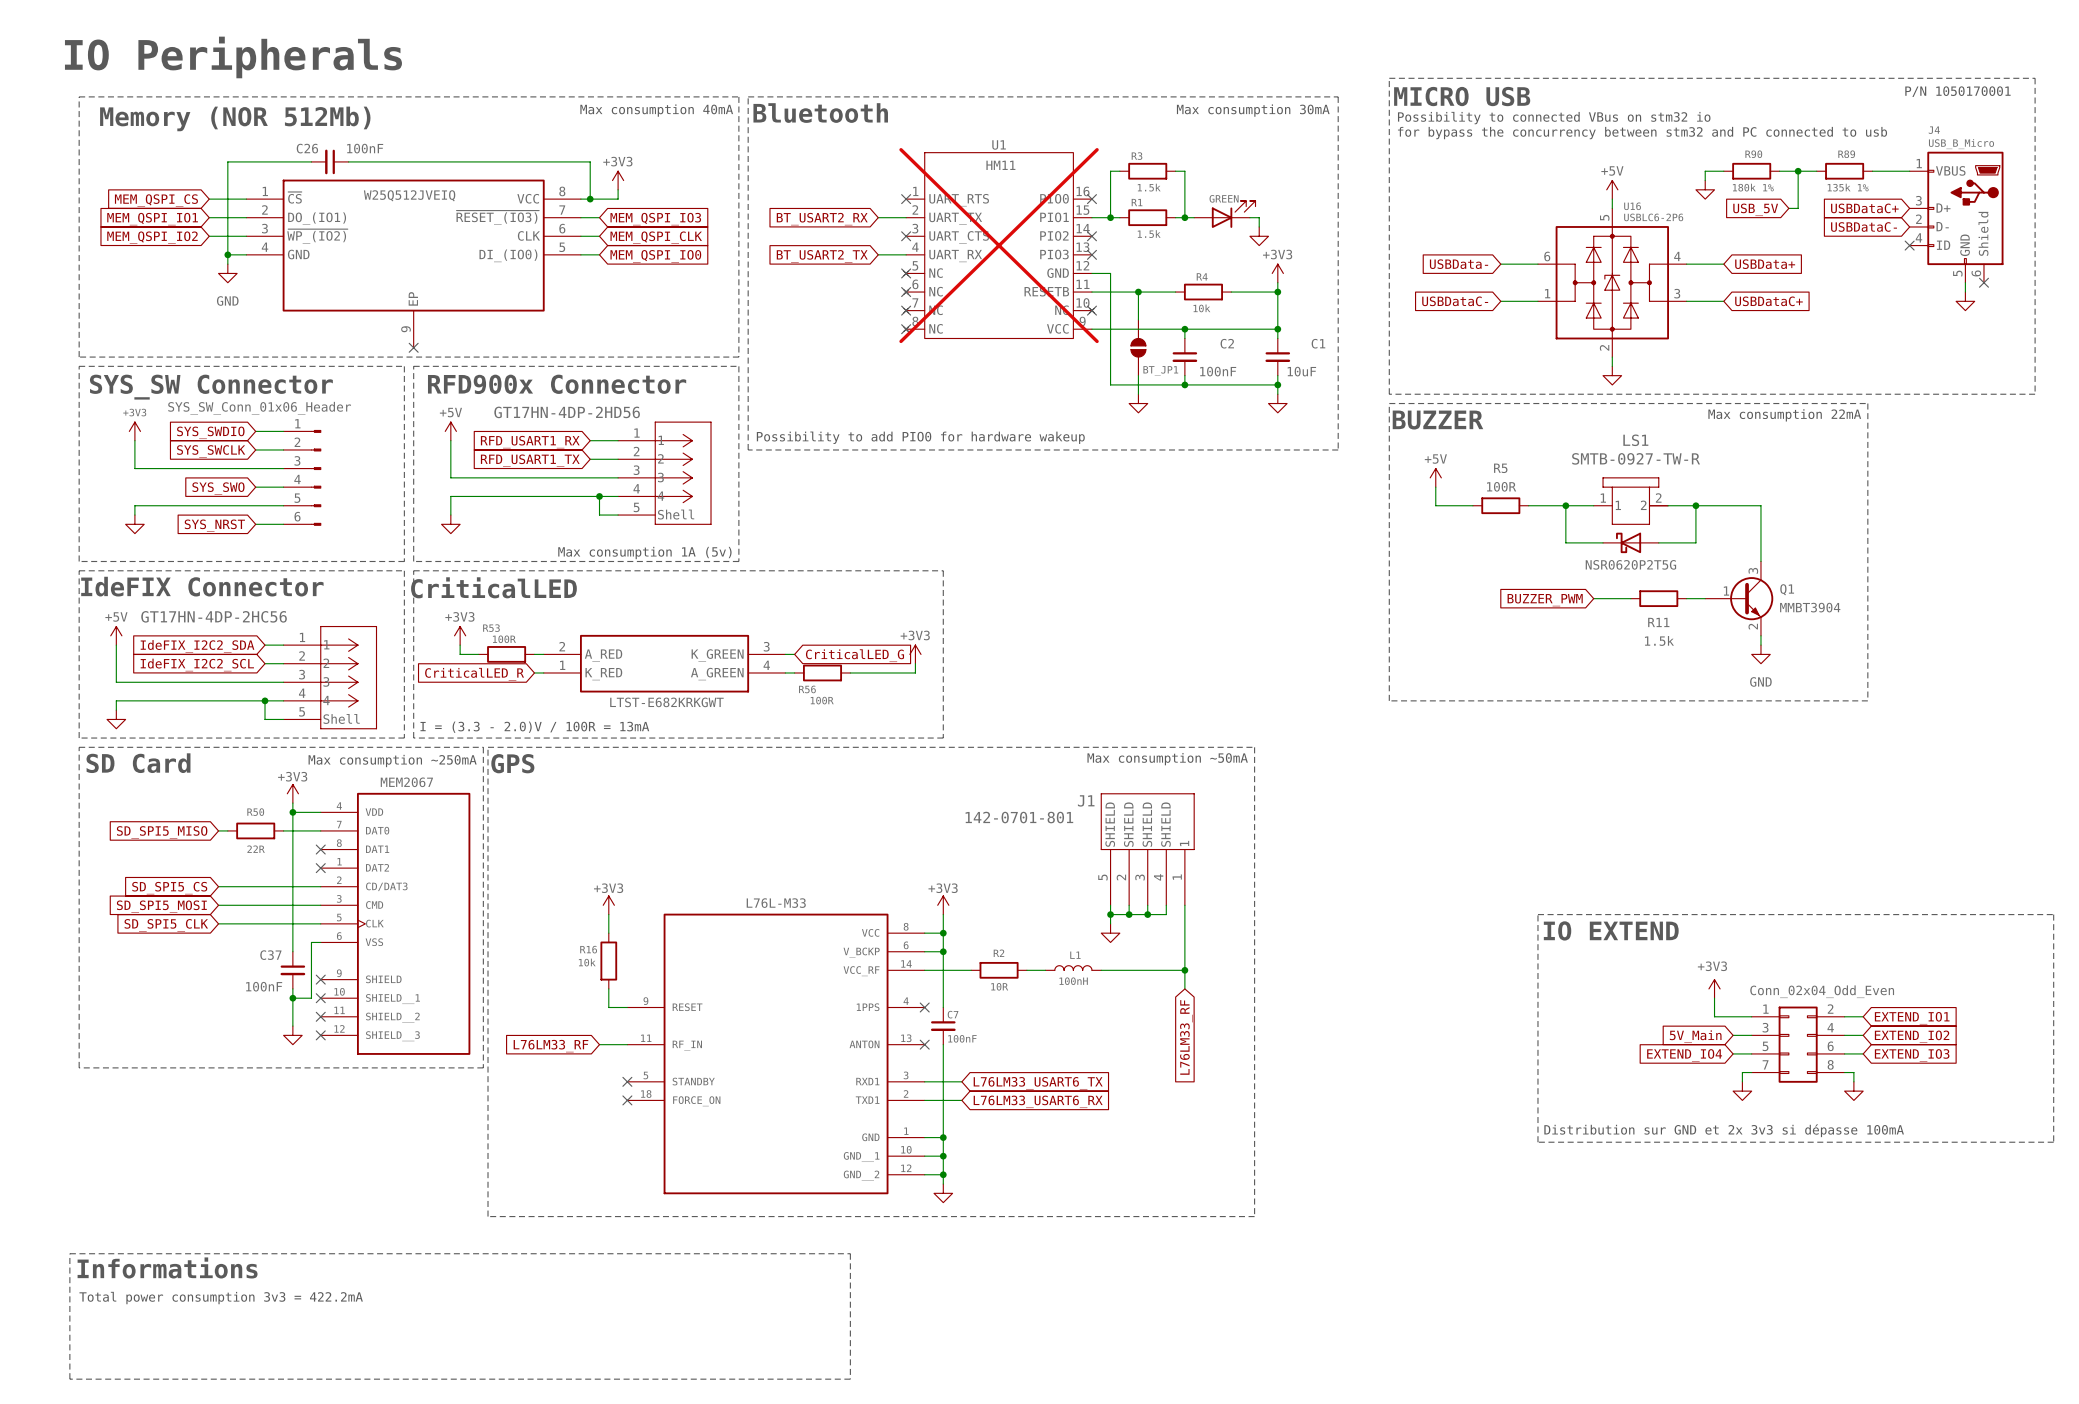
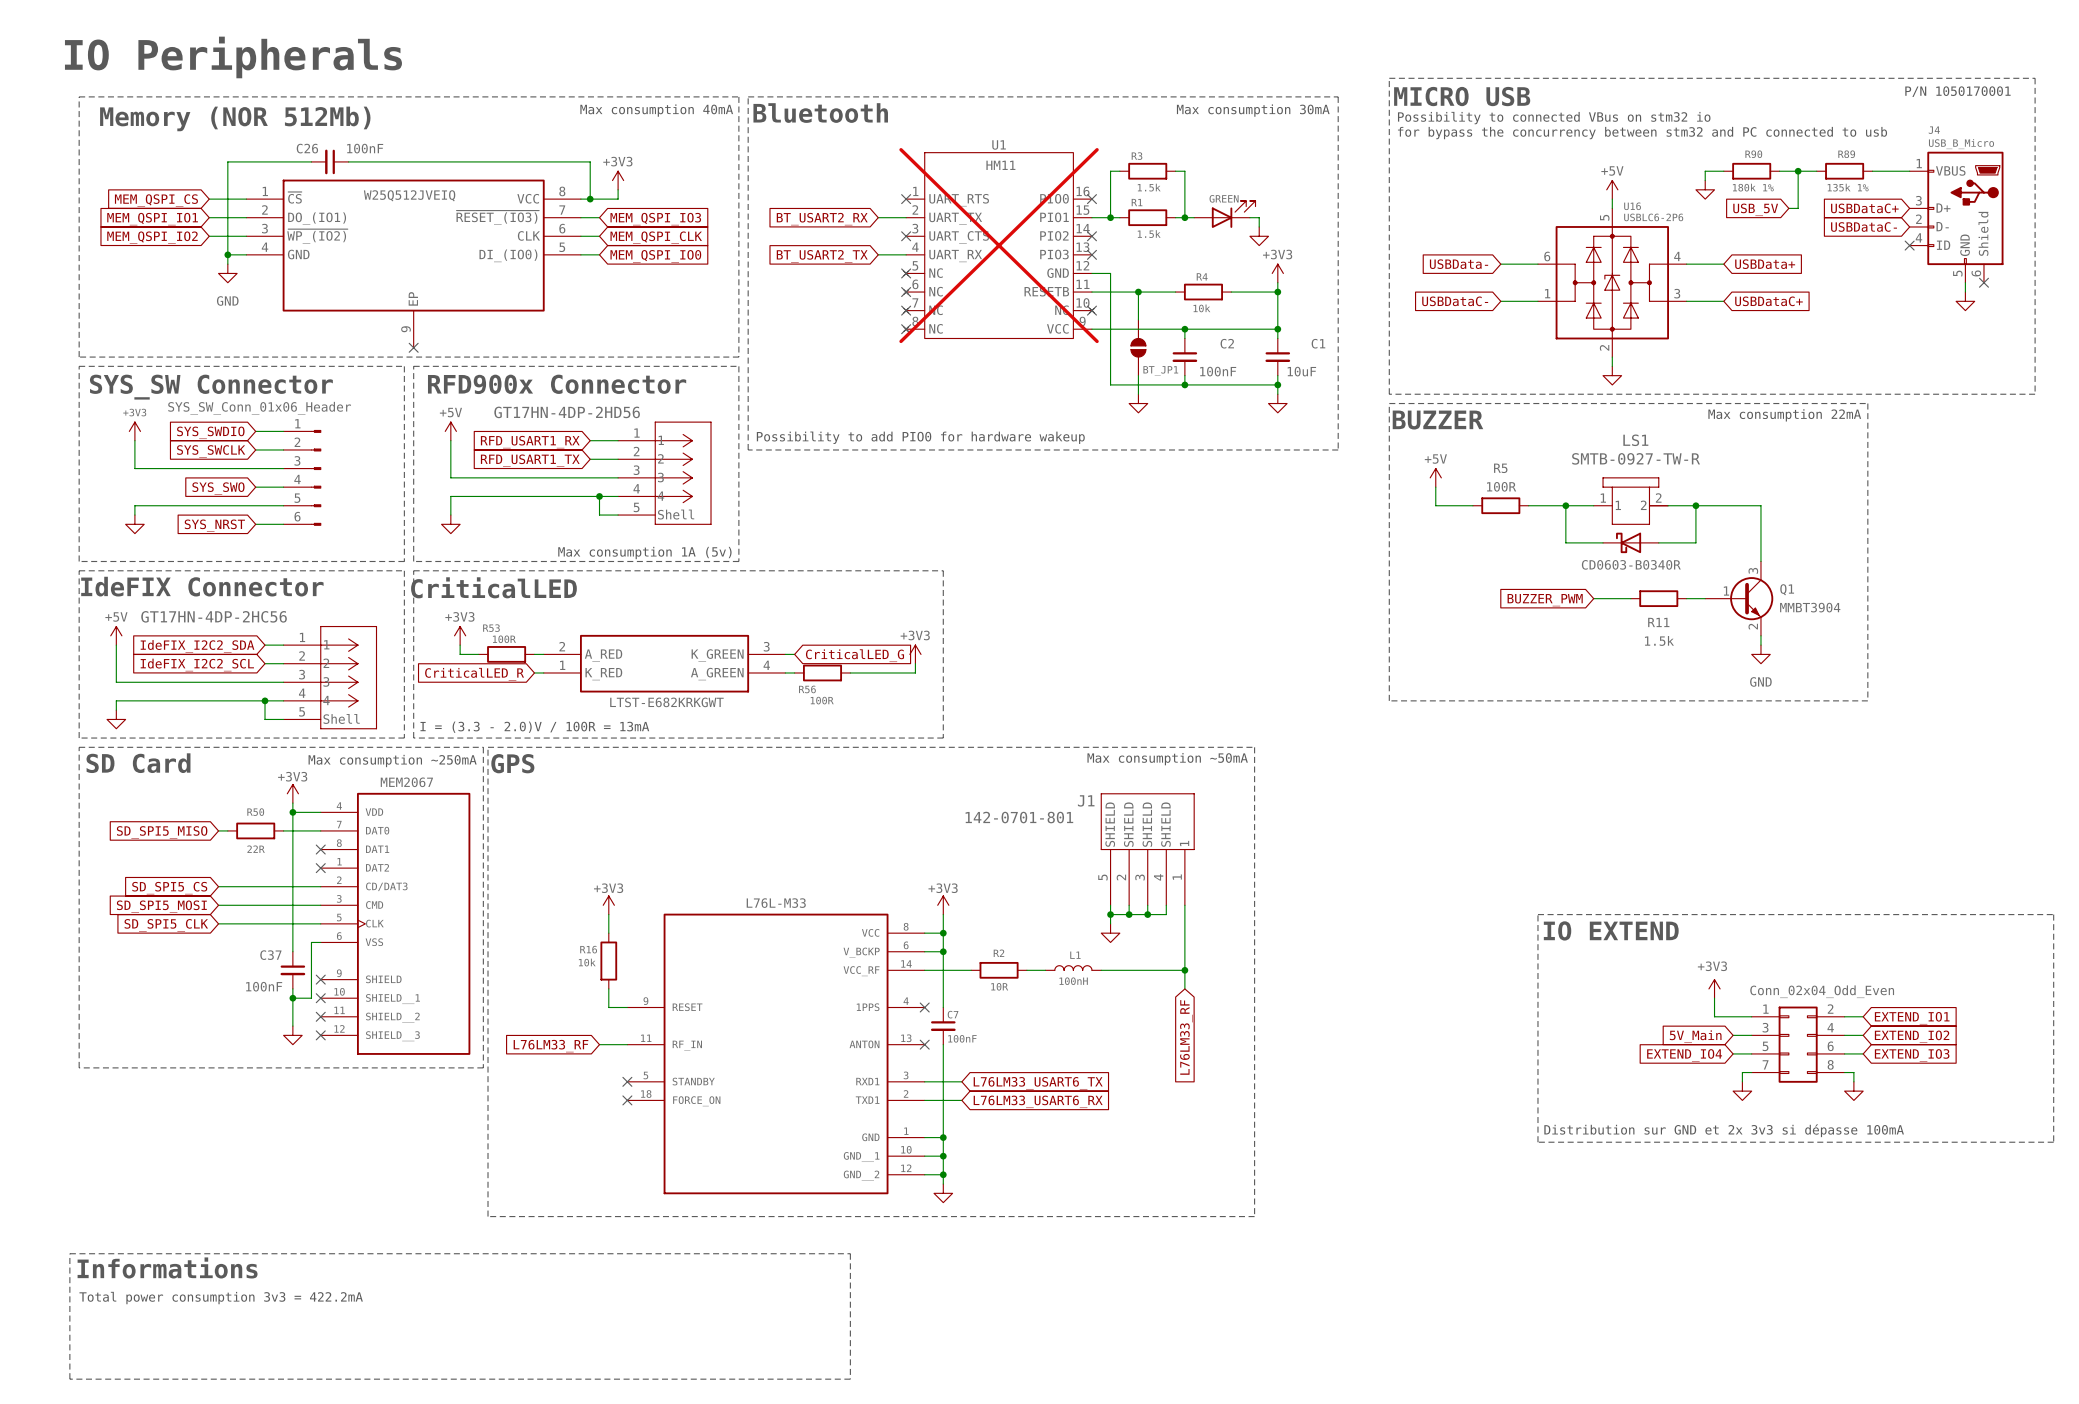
part value: NSR0620P2T5G (1630, 564) -> CD0603-B0340R (1631, 564)

